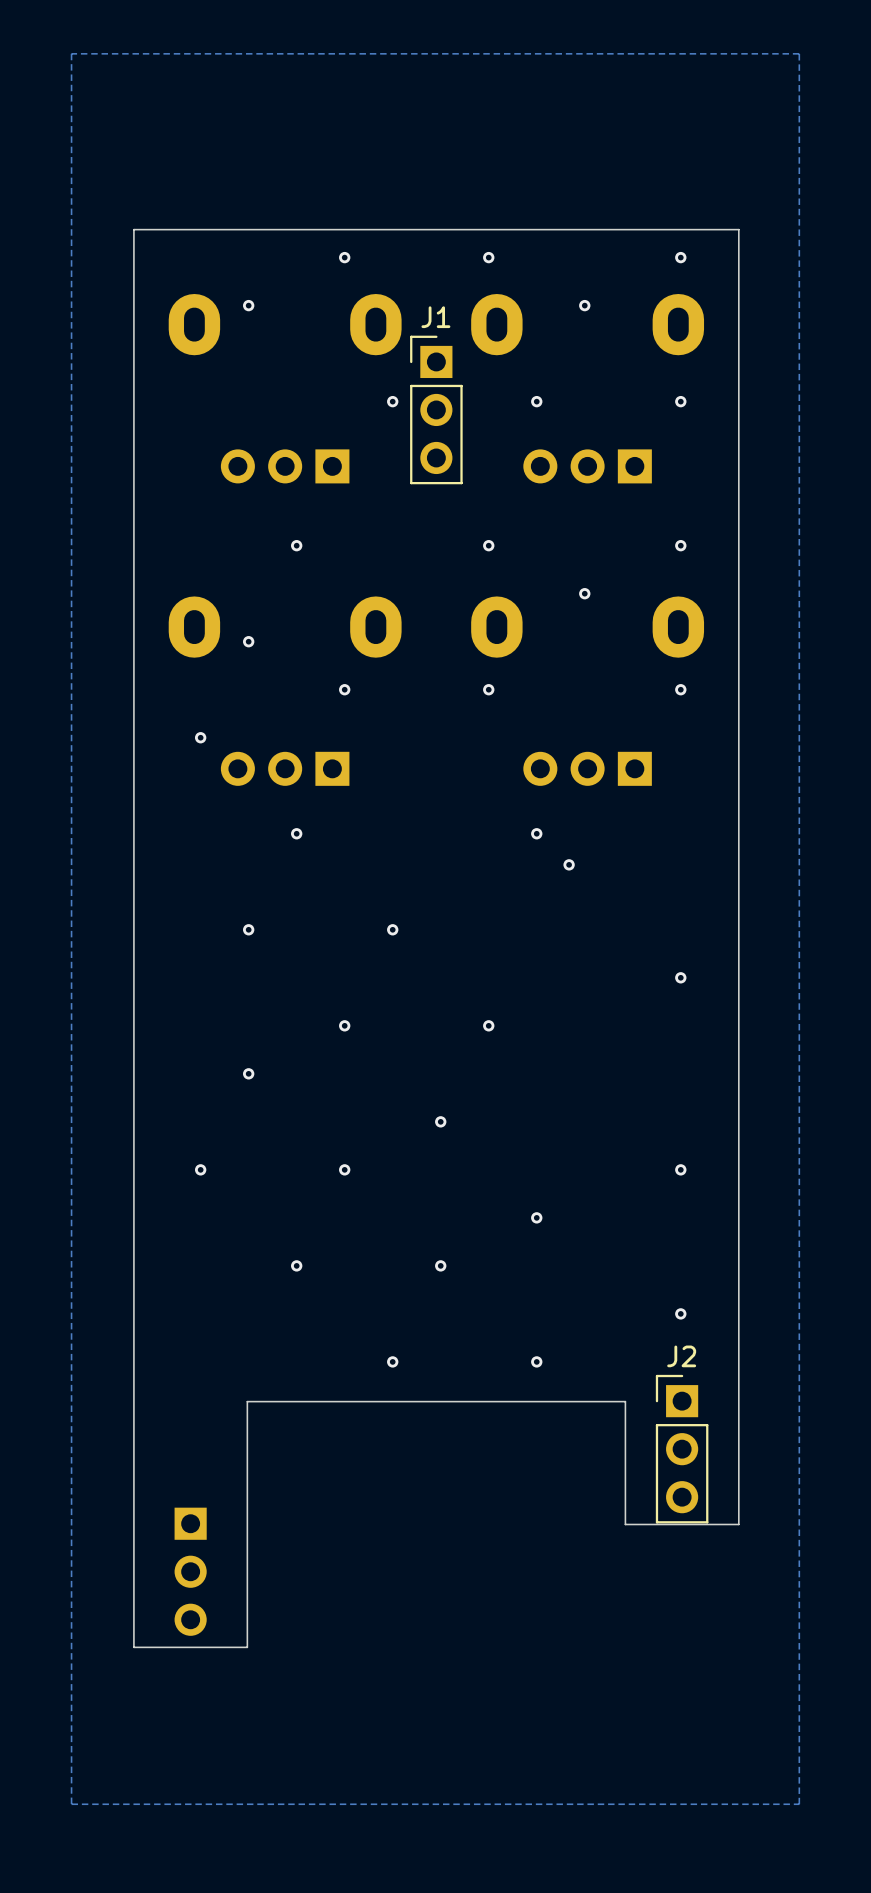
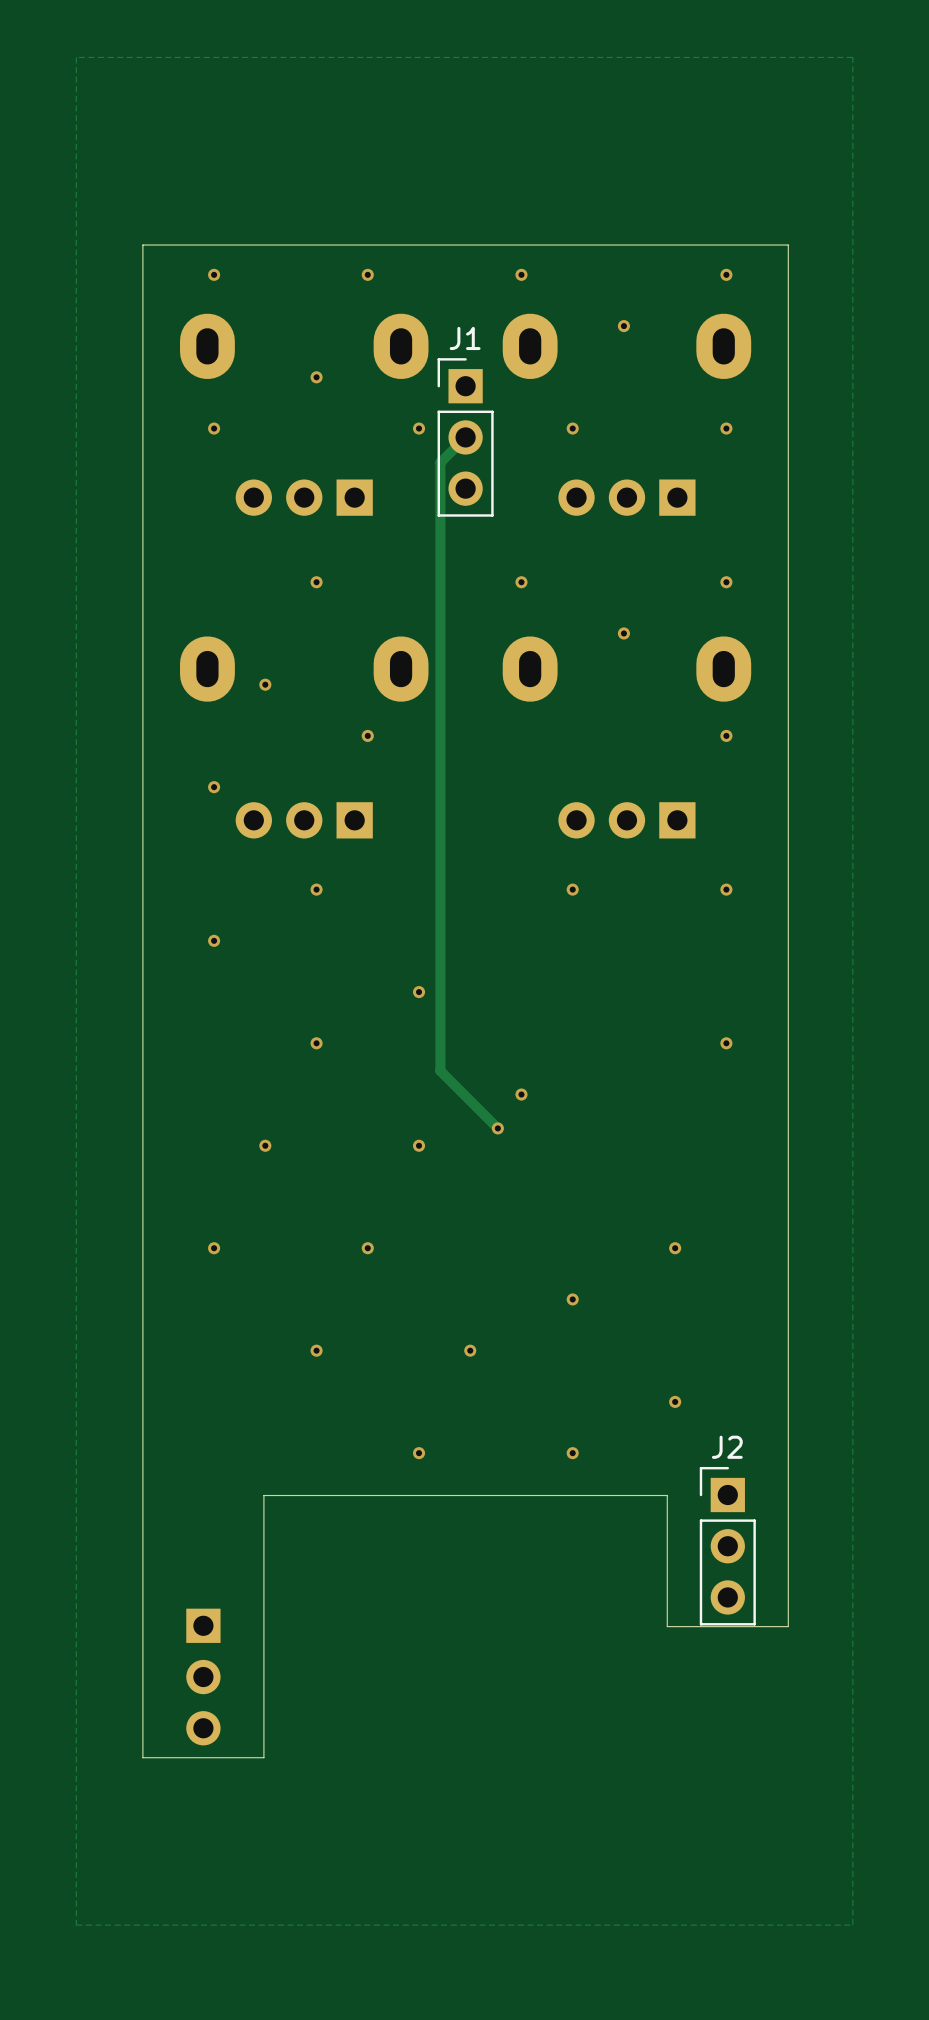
via: none -> (214, 274)
via: (248, 305) -> none
via: none -> (316, 377)
via: none -> (214, 428)
track: none -> (465, 437) (440, 462) (440, 1070) (497, 1128)
via: (488, 689) -> none
via: none -> (726, 889)
via: (569, 864) -> none
via: none -> (214, 940)
via: (248, 929) -> none
via: none -> (316, 1043)
via: (344, 1025) -> none
via: none -> (497, 1128)
via: none -> (419, 1145)
via: (440, 1121) -> none
via position: (680, 1169) -> (675, 1248)
via position: (680, 1313) -> (675, 1401)

